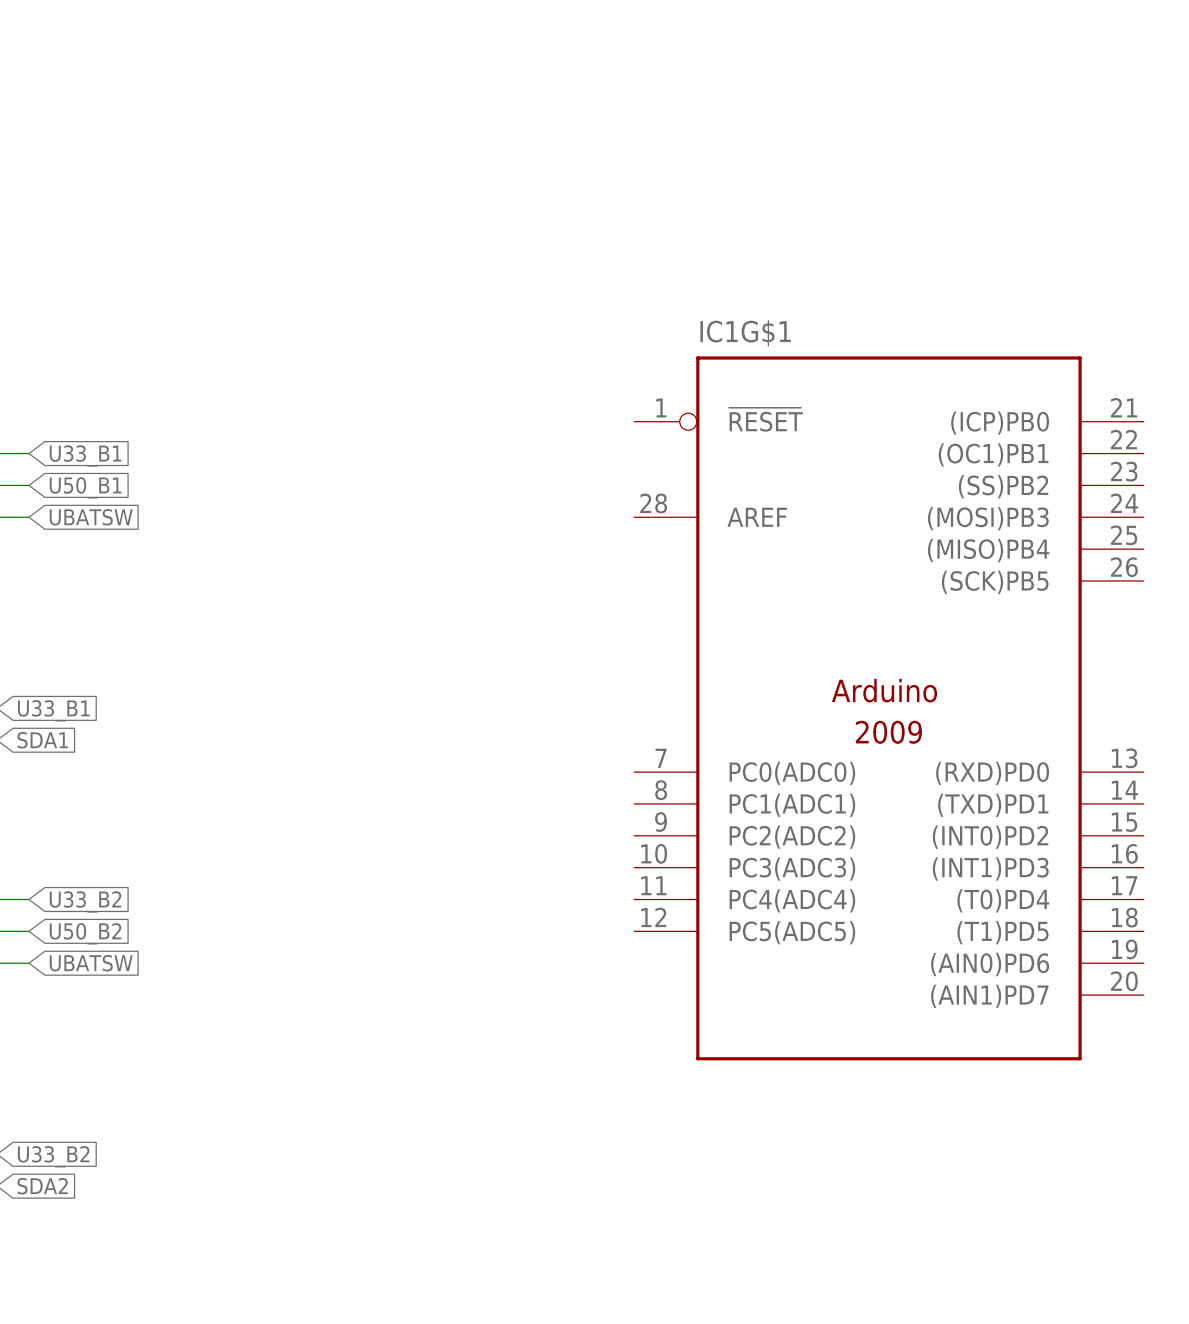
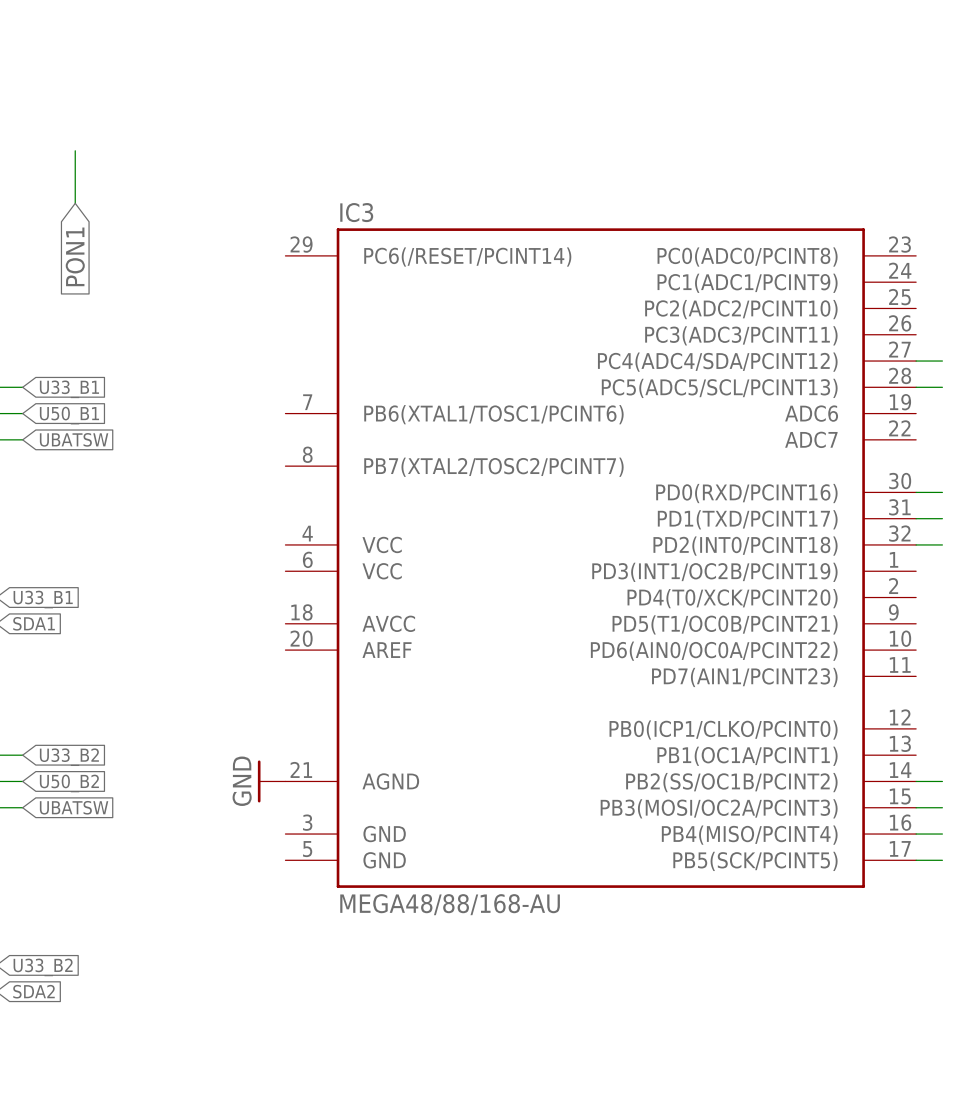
wire: none -> (75, 150) (75, 203)
global label: none -> PON1 (75, 256)
wire: none -> (916, 518) (942, 518)
wire: none -> (916, 544) (942, 544)
IC3: none -> MEGA48/88/168-AU (600, 558)
IC1G$1: (888, 708) -> none
power symbol: none -> GND (271, 781)
wire: none -> (916, 860) (942, 860)

